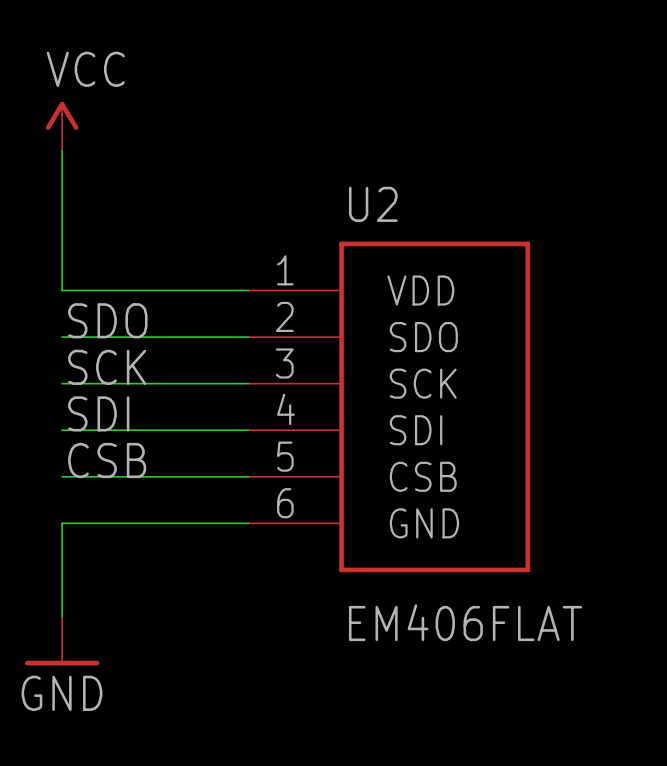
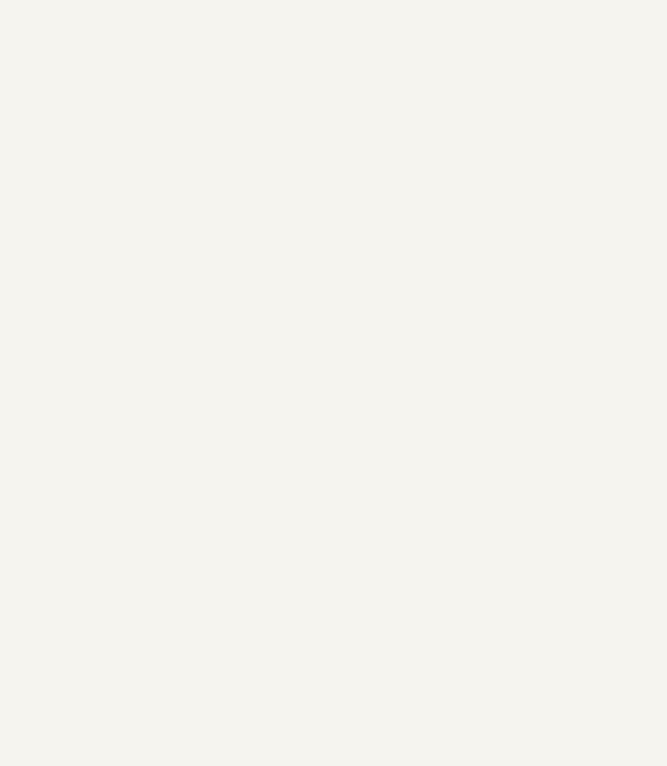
power symbol: VCC (62, 126) -> none
wire: (62, 150) (62, 290) (248, 290) -> none
label: SDO (107, 320) -> none
wire: (62, 337) (248, 337) -> none
label: SCK (107, 367) -> none
wire: (62, 383) (248, 383) -> none
U2: EM406FLAT (389, 406) -> none
label: SDI (98, 413) -> none
wire: (62, 430) (248, 430) -> none
label: CSB (107, 460) -> none
wire: (62, 476) (248, 476) -> none
wire: (248, 523) (62, 523) (62, 616) -> none
power symbol: GND (62, 640) -> none

